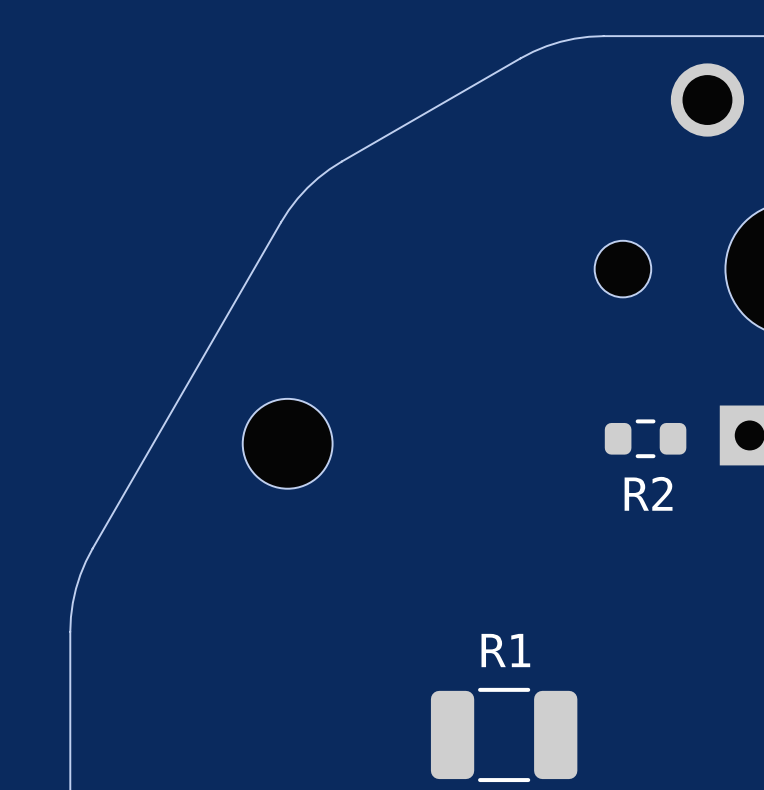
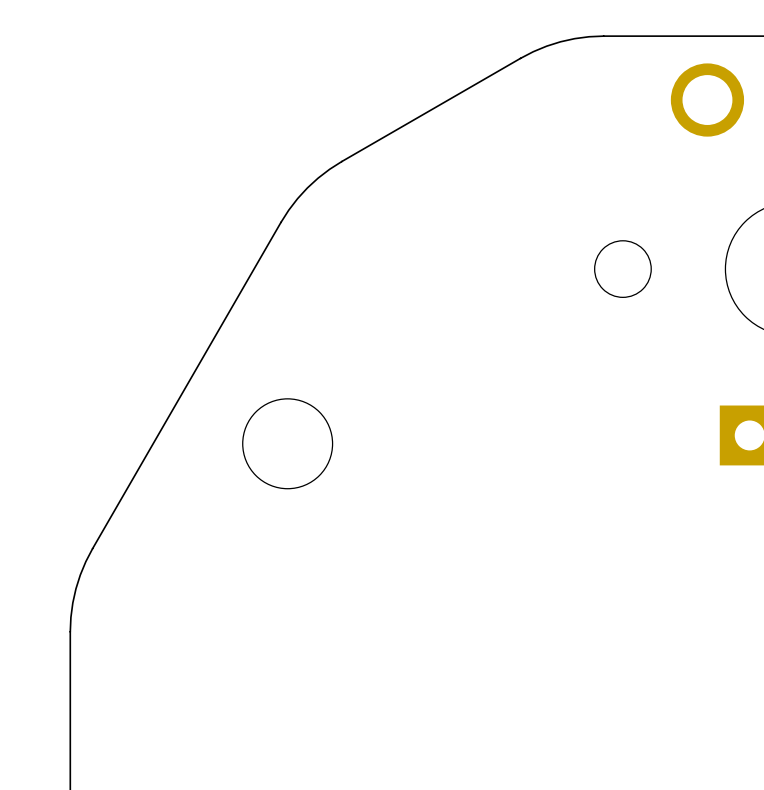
R2: (645, 438) -> none
R1: (504, 734) -> none

